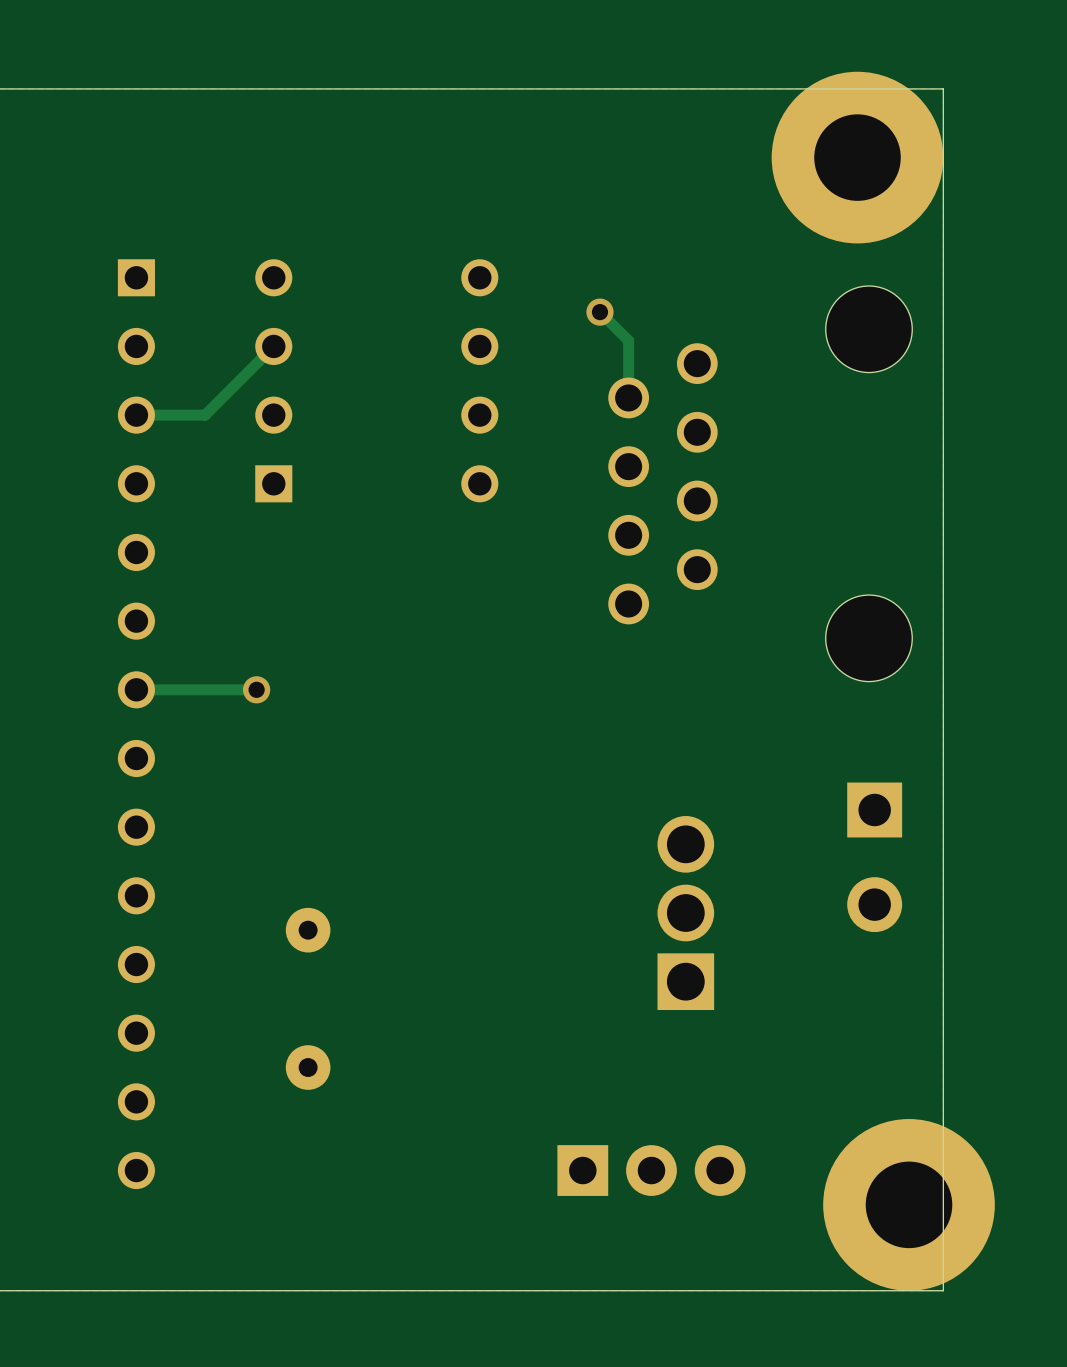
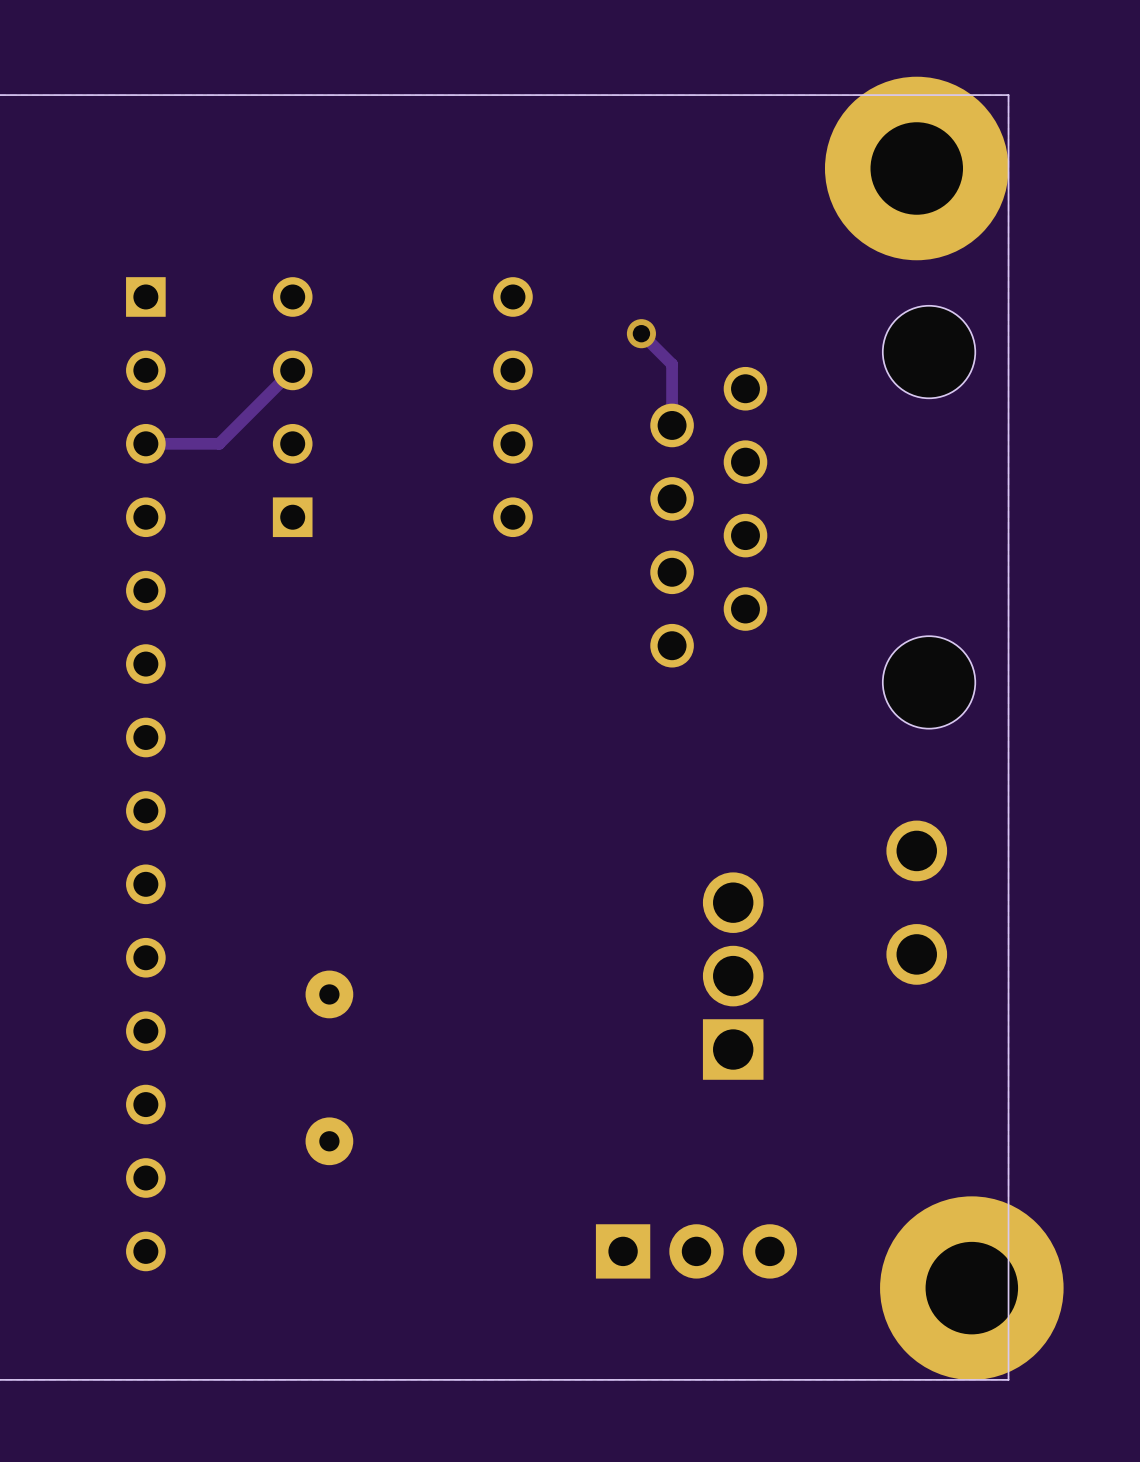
track: (256, 689) (136, 689) -> none
via: (256, 689) -> none
part footprint: [847, 782, 903, 933] -> [886, 820, 948, 985]

